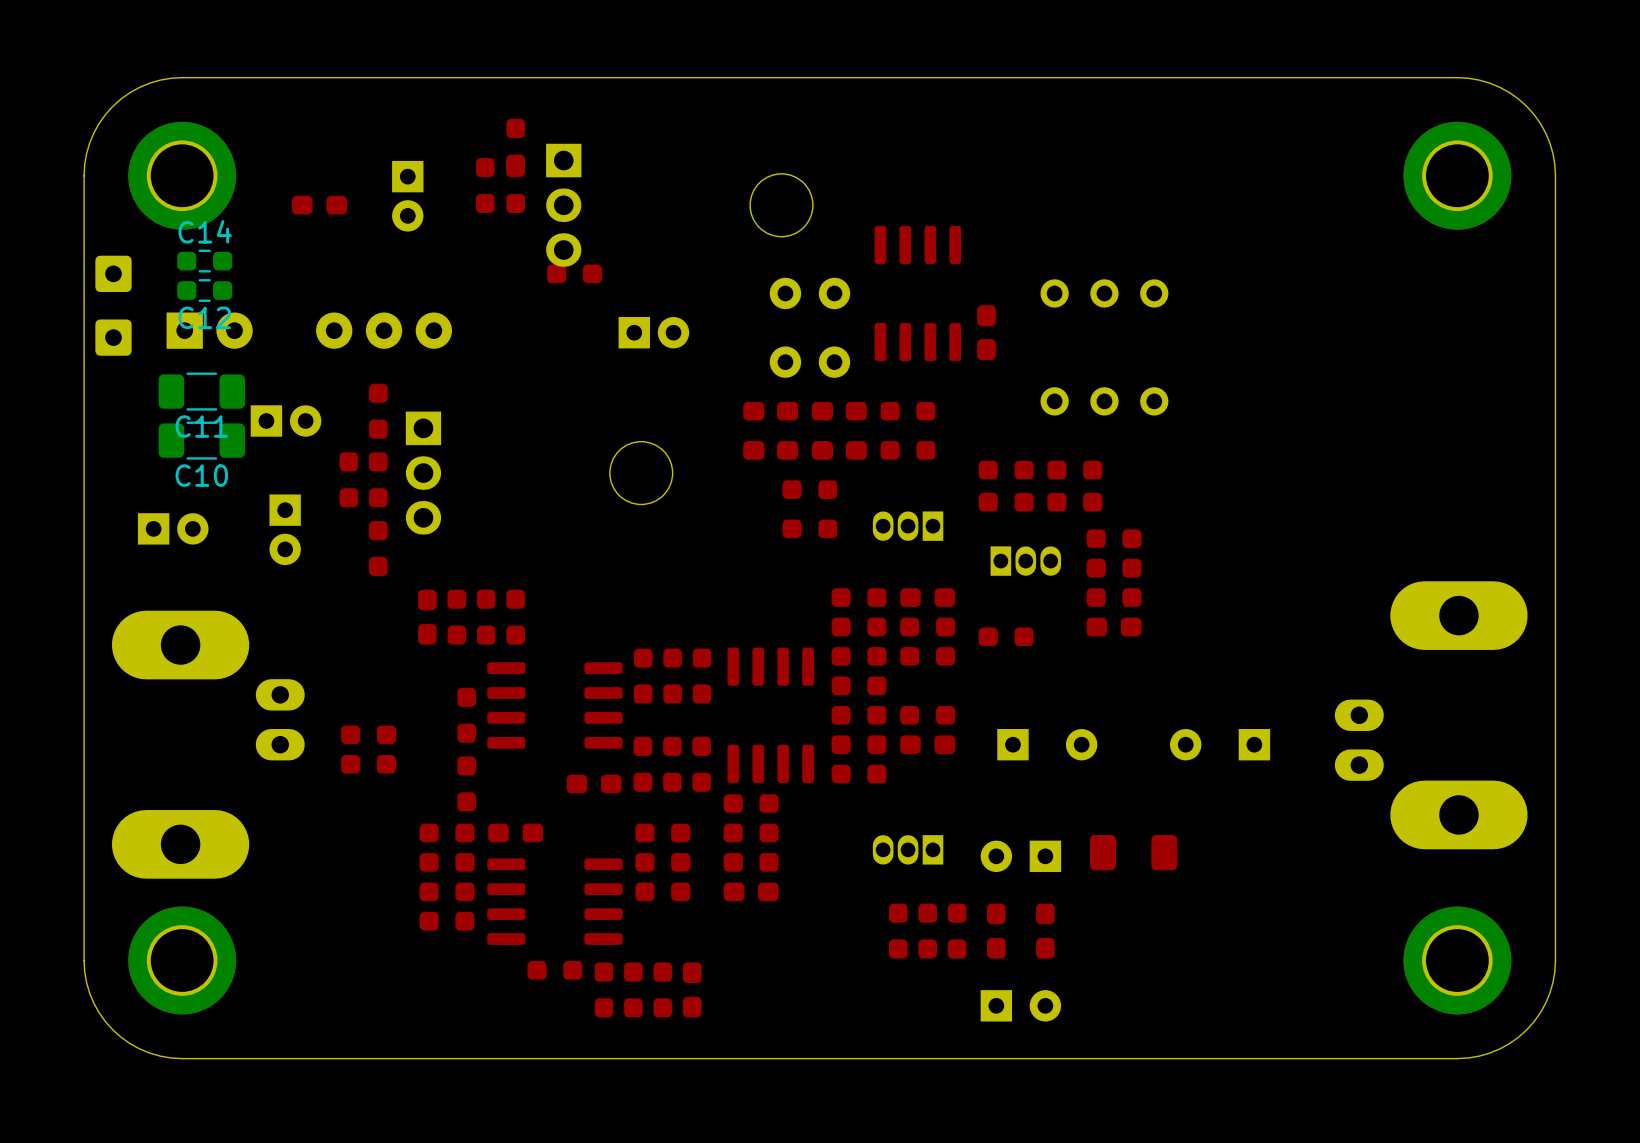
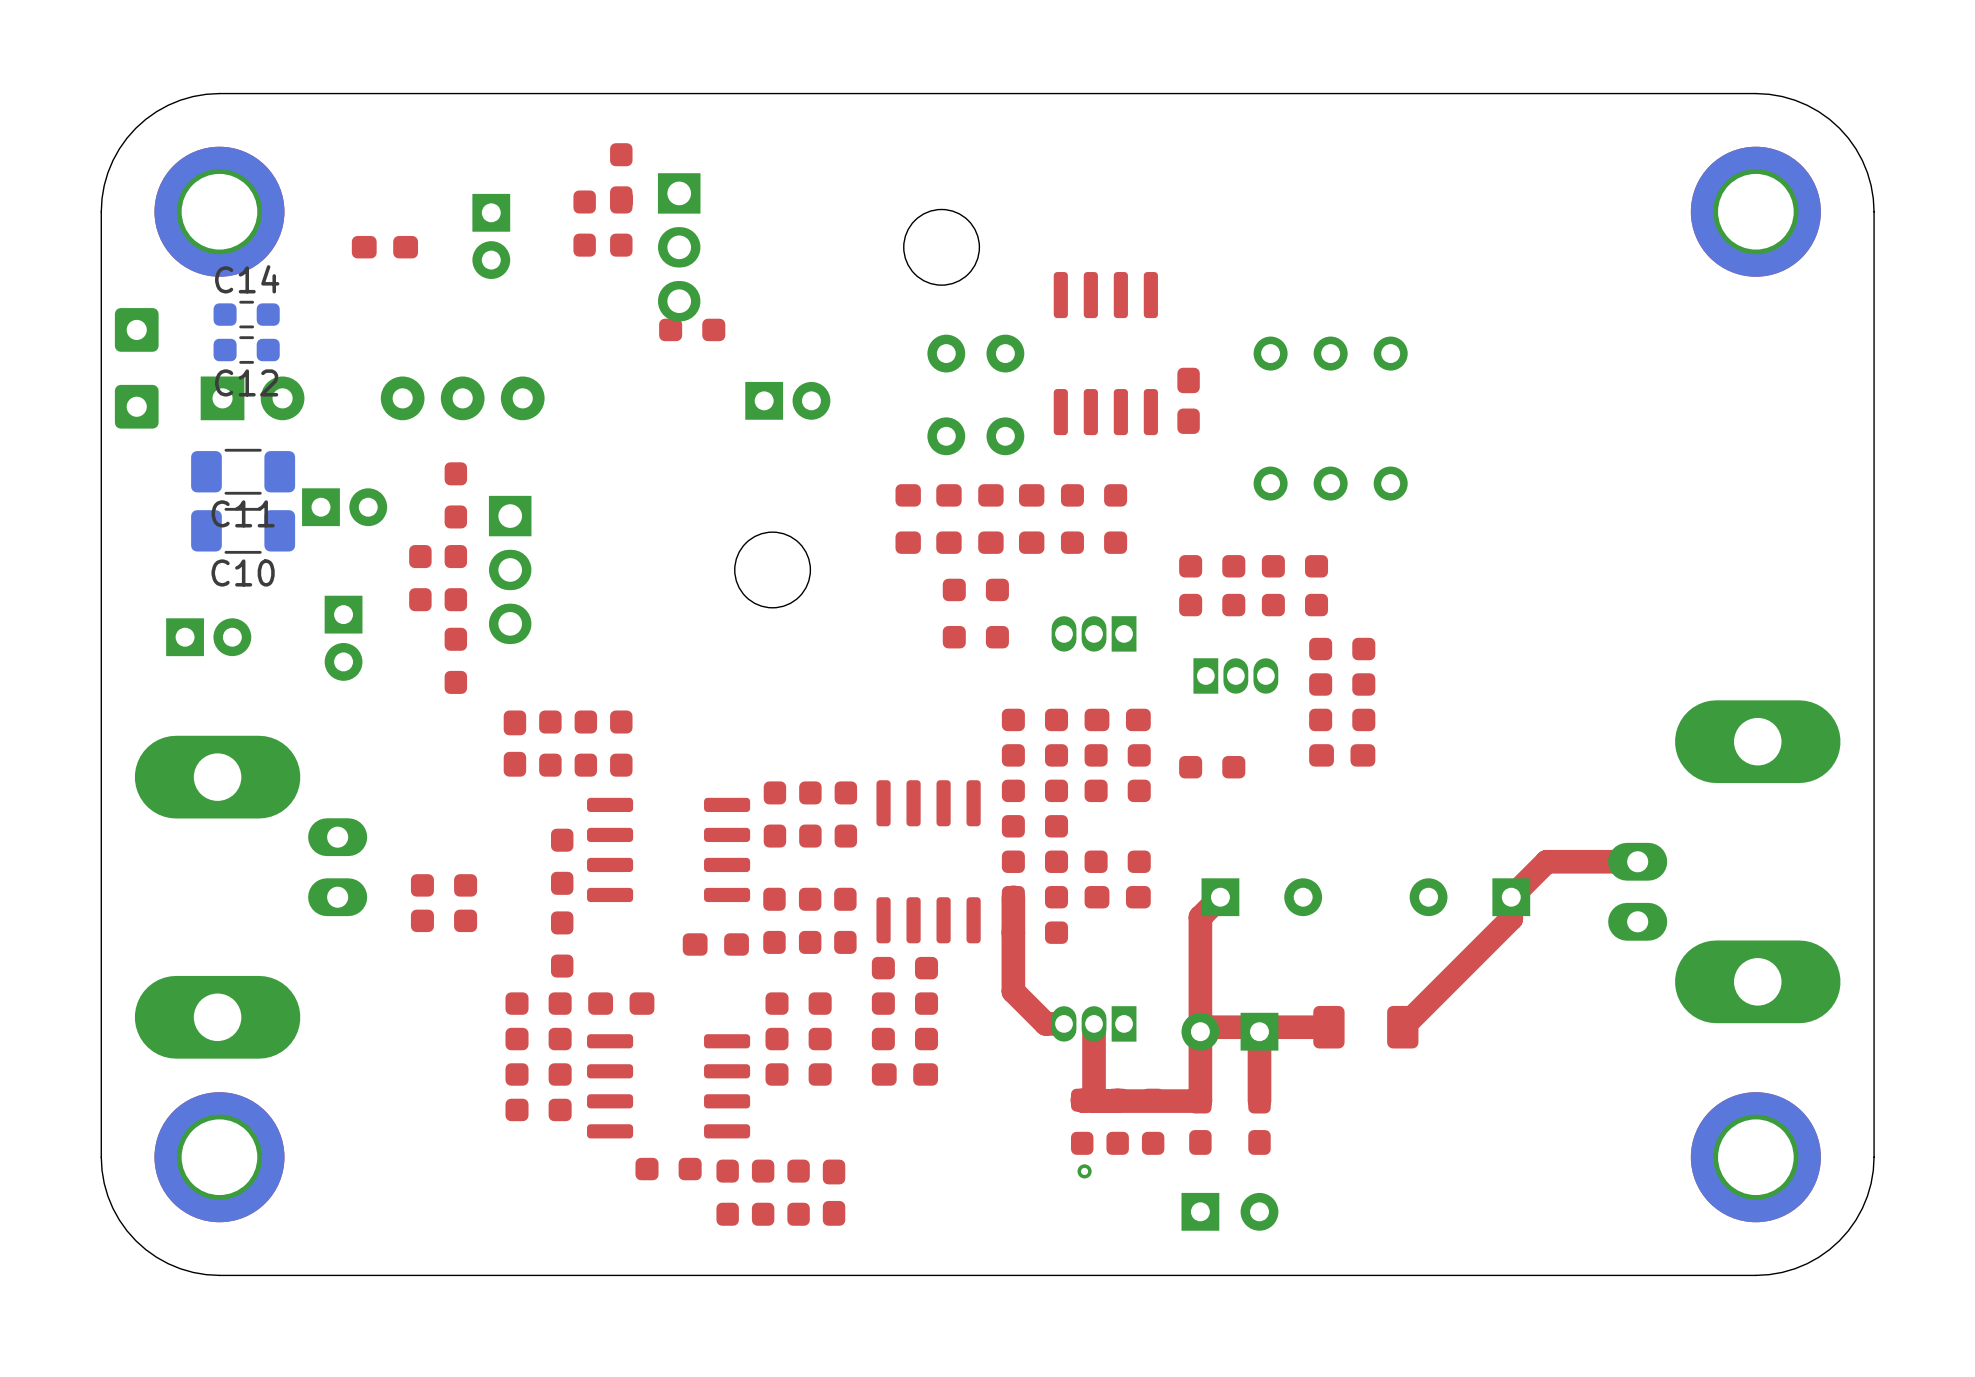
top track: none -> (1637, 861) (1546, 861) (1511, 897) (1511, 918) (1402, 1027)
top track: none -> (1013, 897) (1013, 991) (1045, 1023) (1064, 1023)
top track: none -> (1220, 897) (1200, 917) (1200, 1101) (1082, 1100)
top track: none -> (1094, 1023) (1094, 1101)
top track: none -> (1328, 1027) (1204, 1027) (1200, 1031)
top track: none -> (1259, 1031) (1259, 1101)
via: none -> (1084, 1171)

